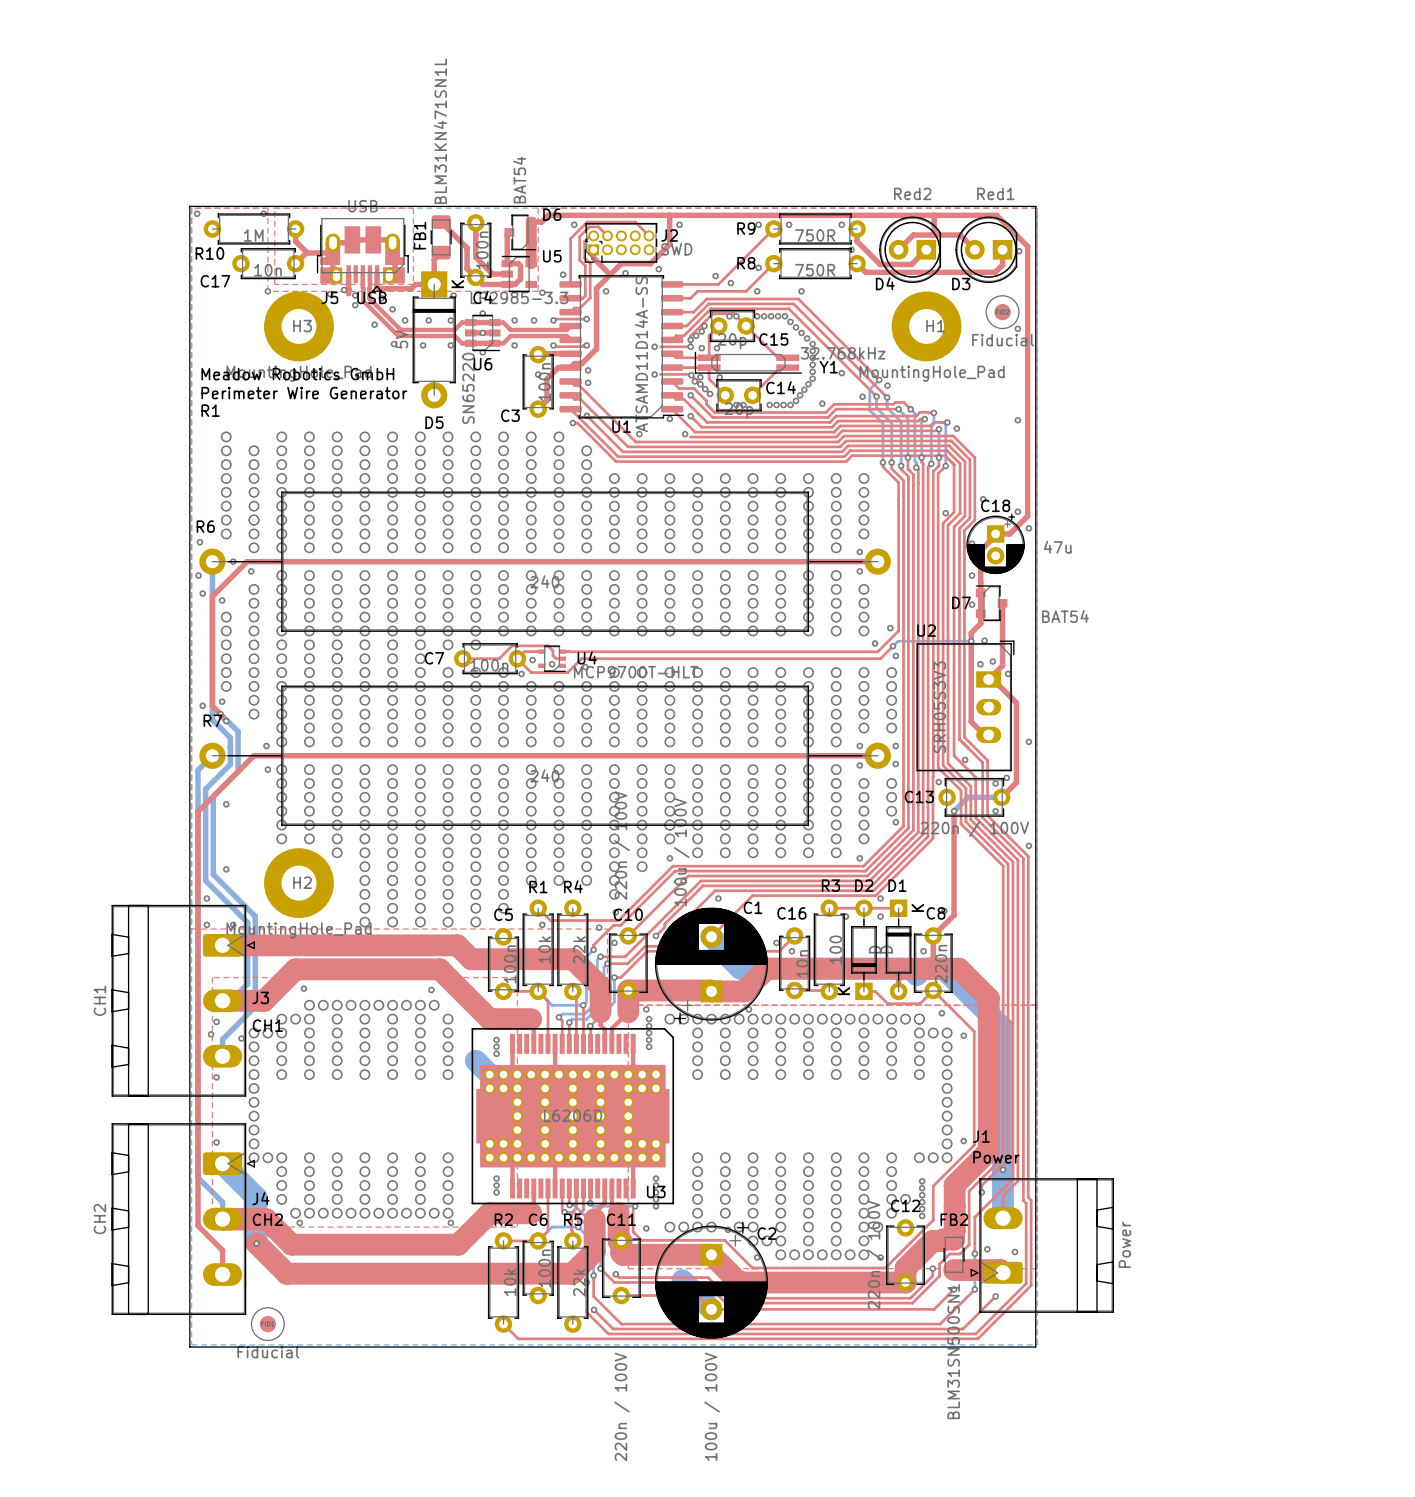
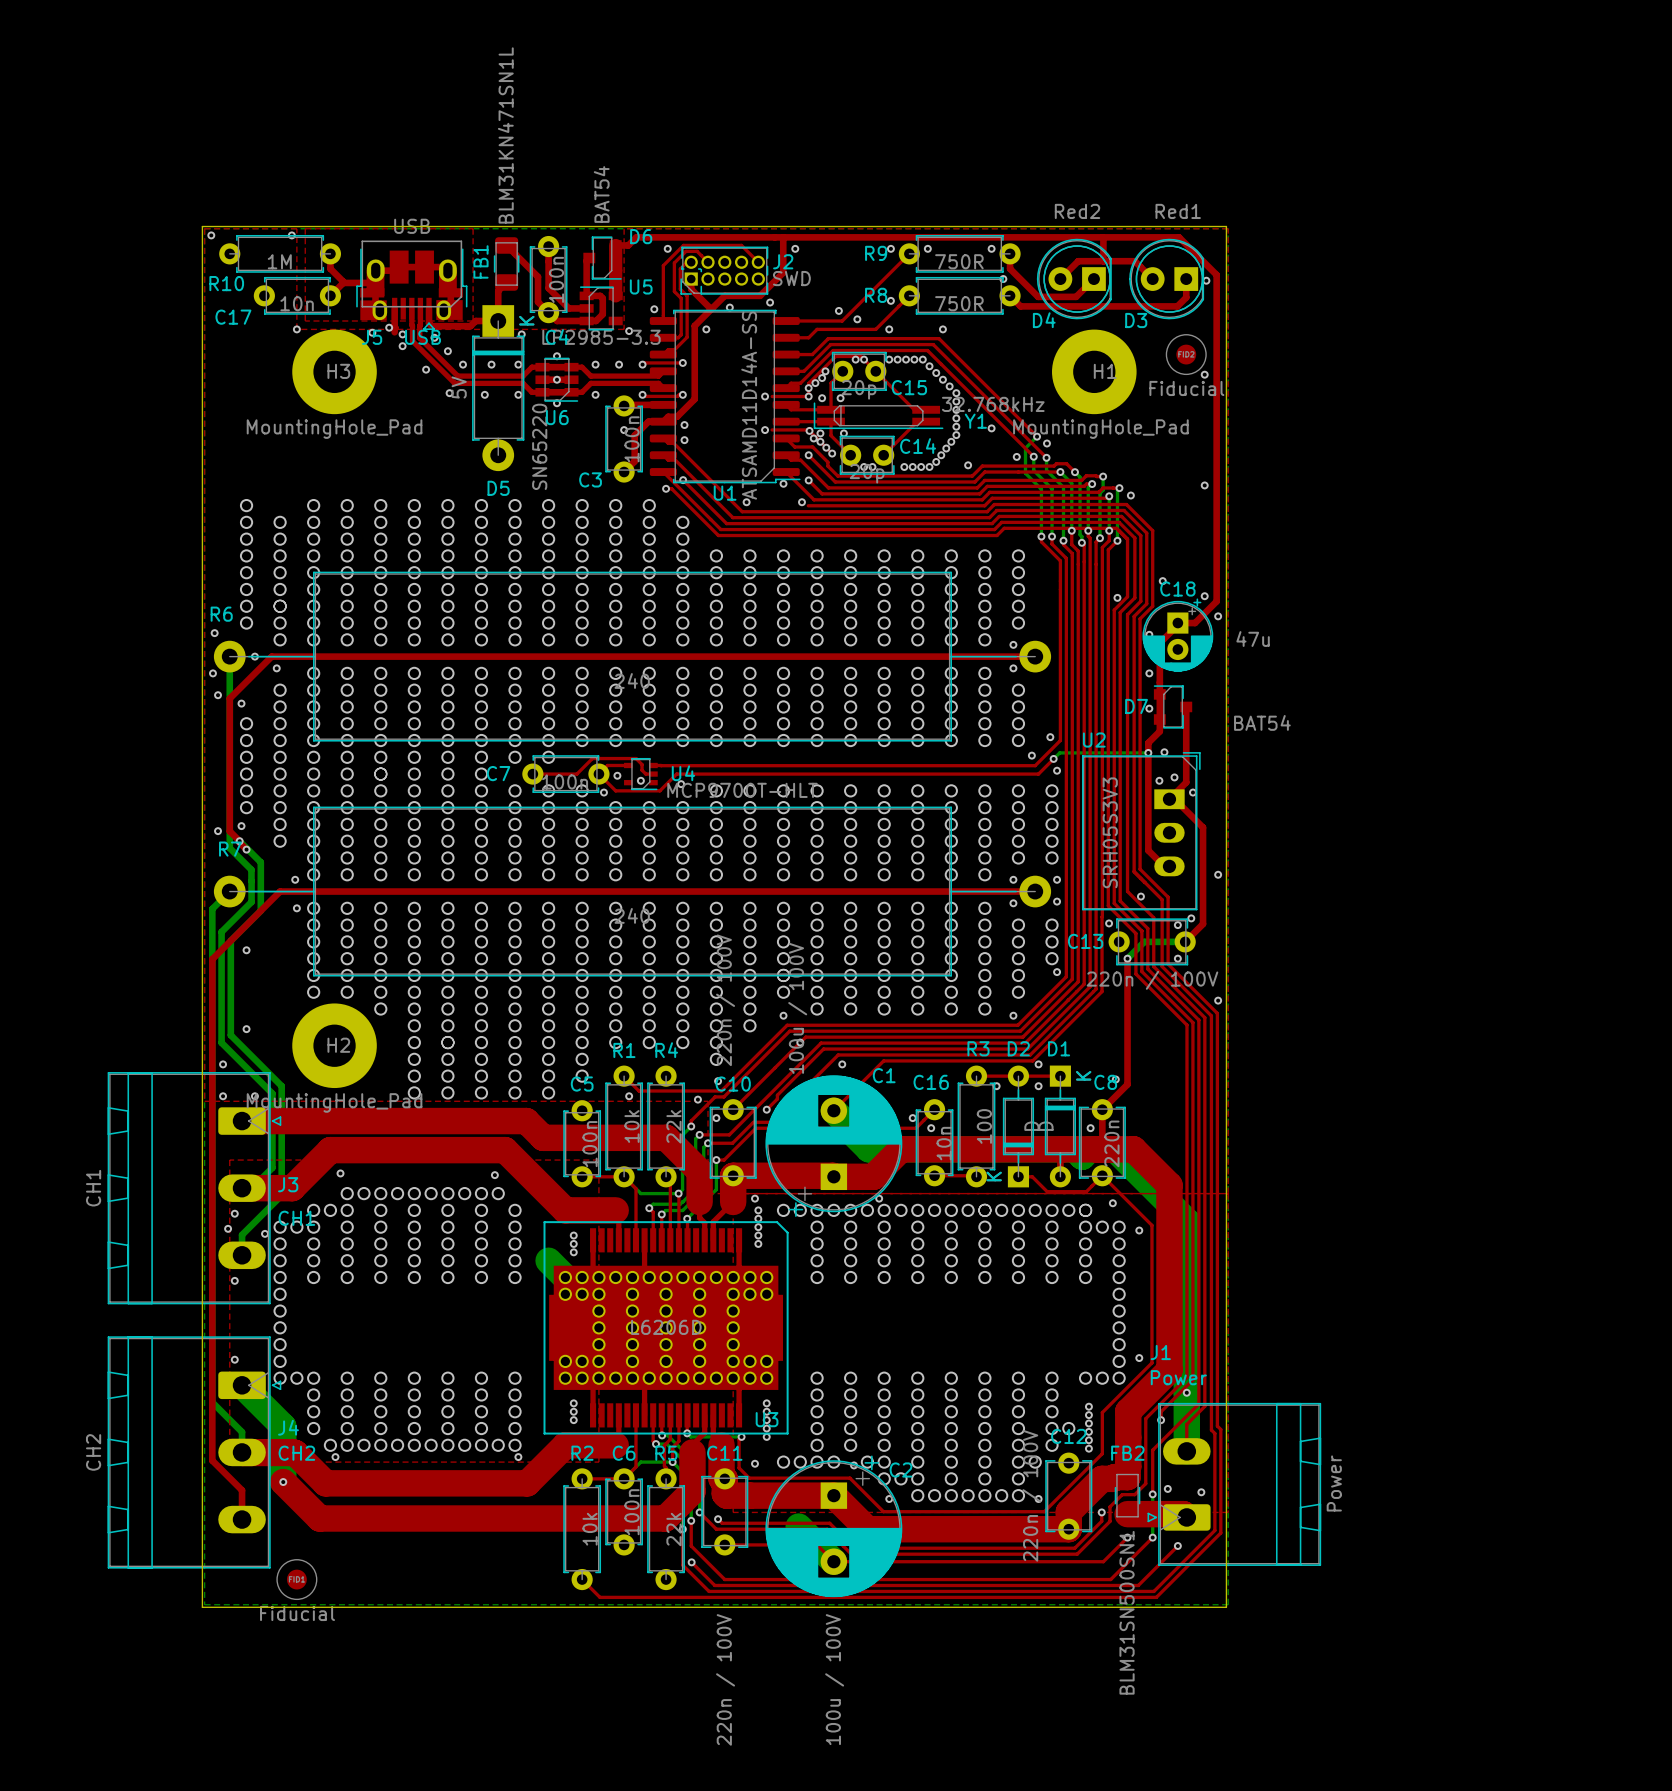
text: Meadow Robotics GmbH (297, 374) -> none
text: Perimeter Wire Generator (304, 393) -> none
text: R1 (210, 410) -> none

